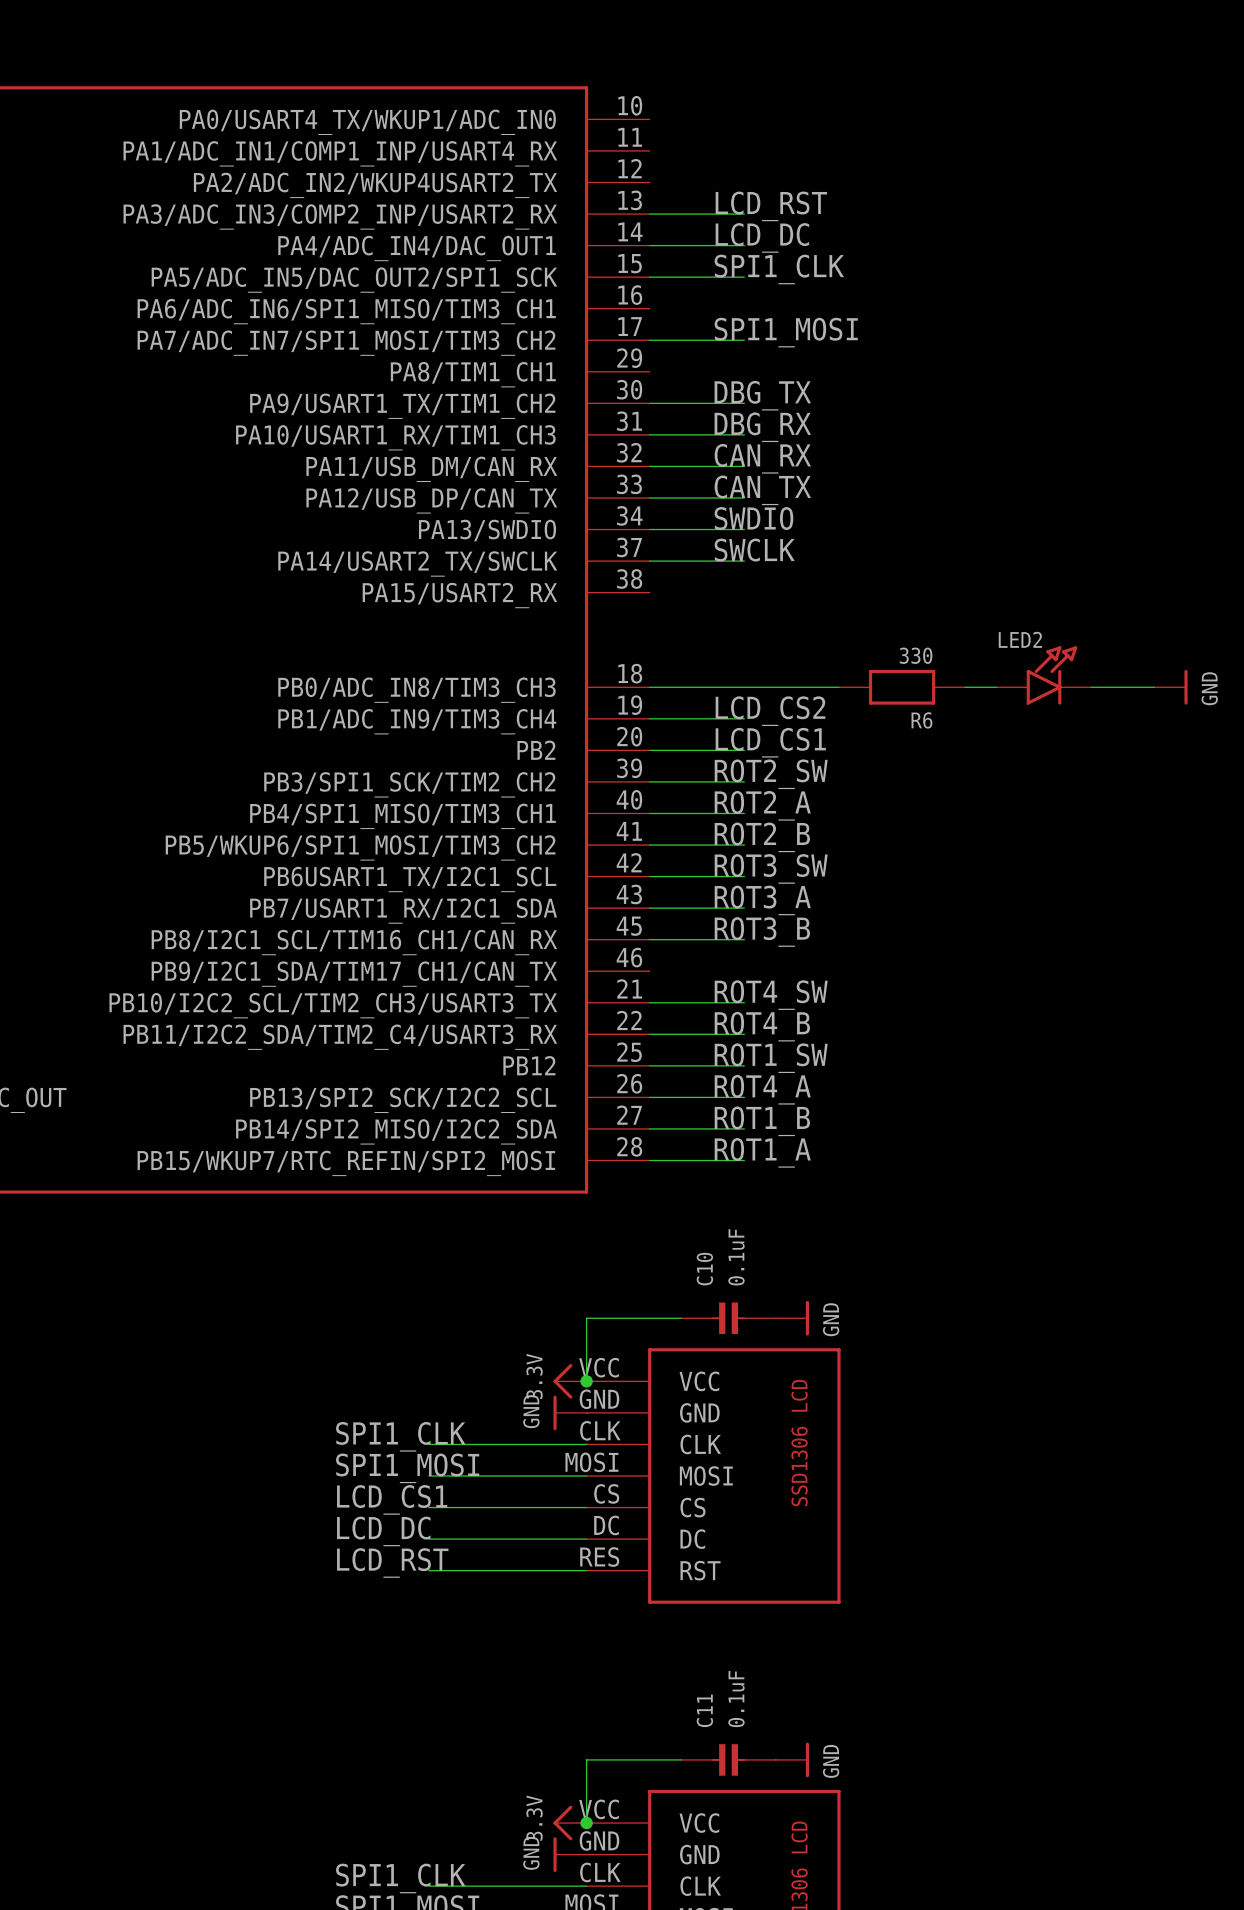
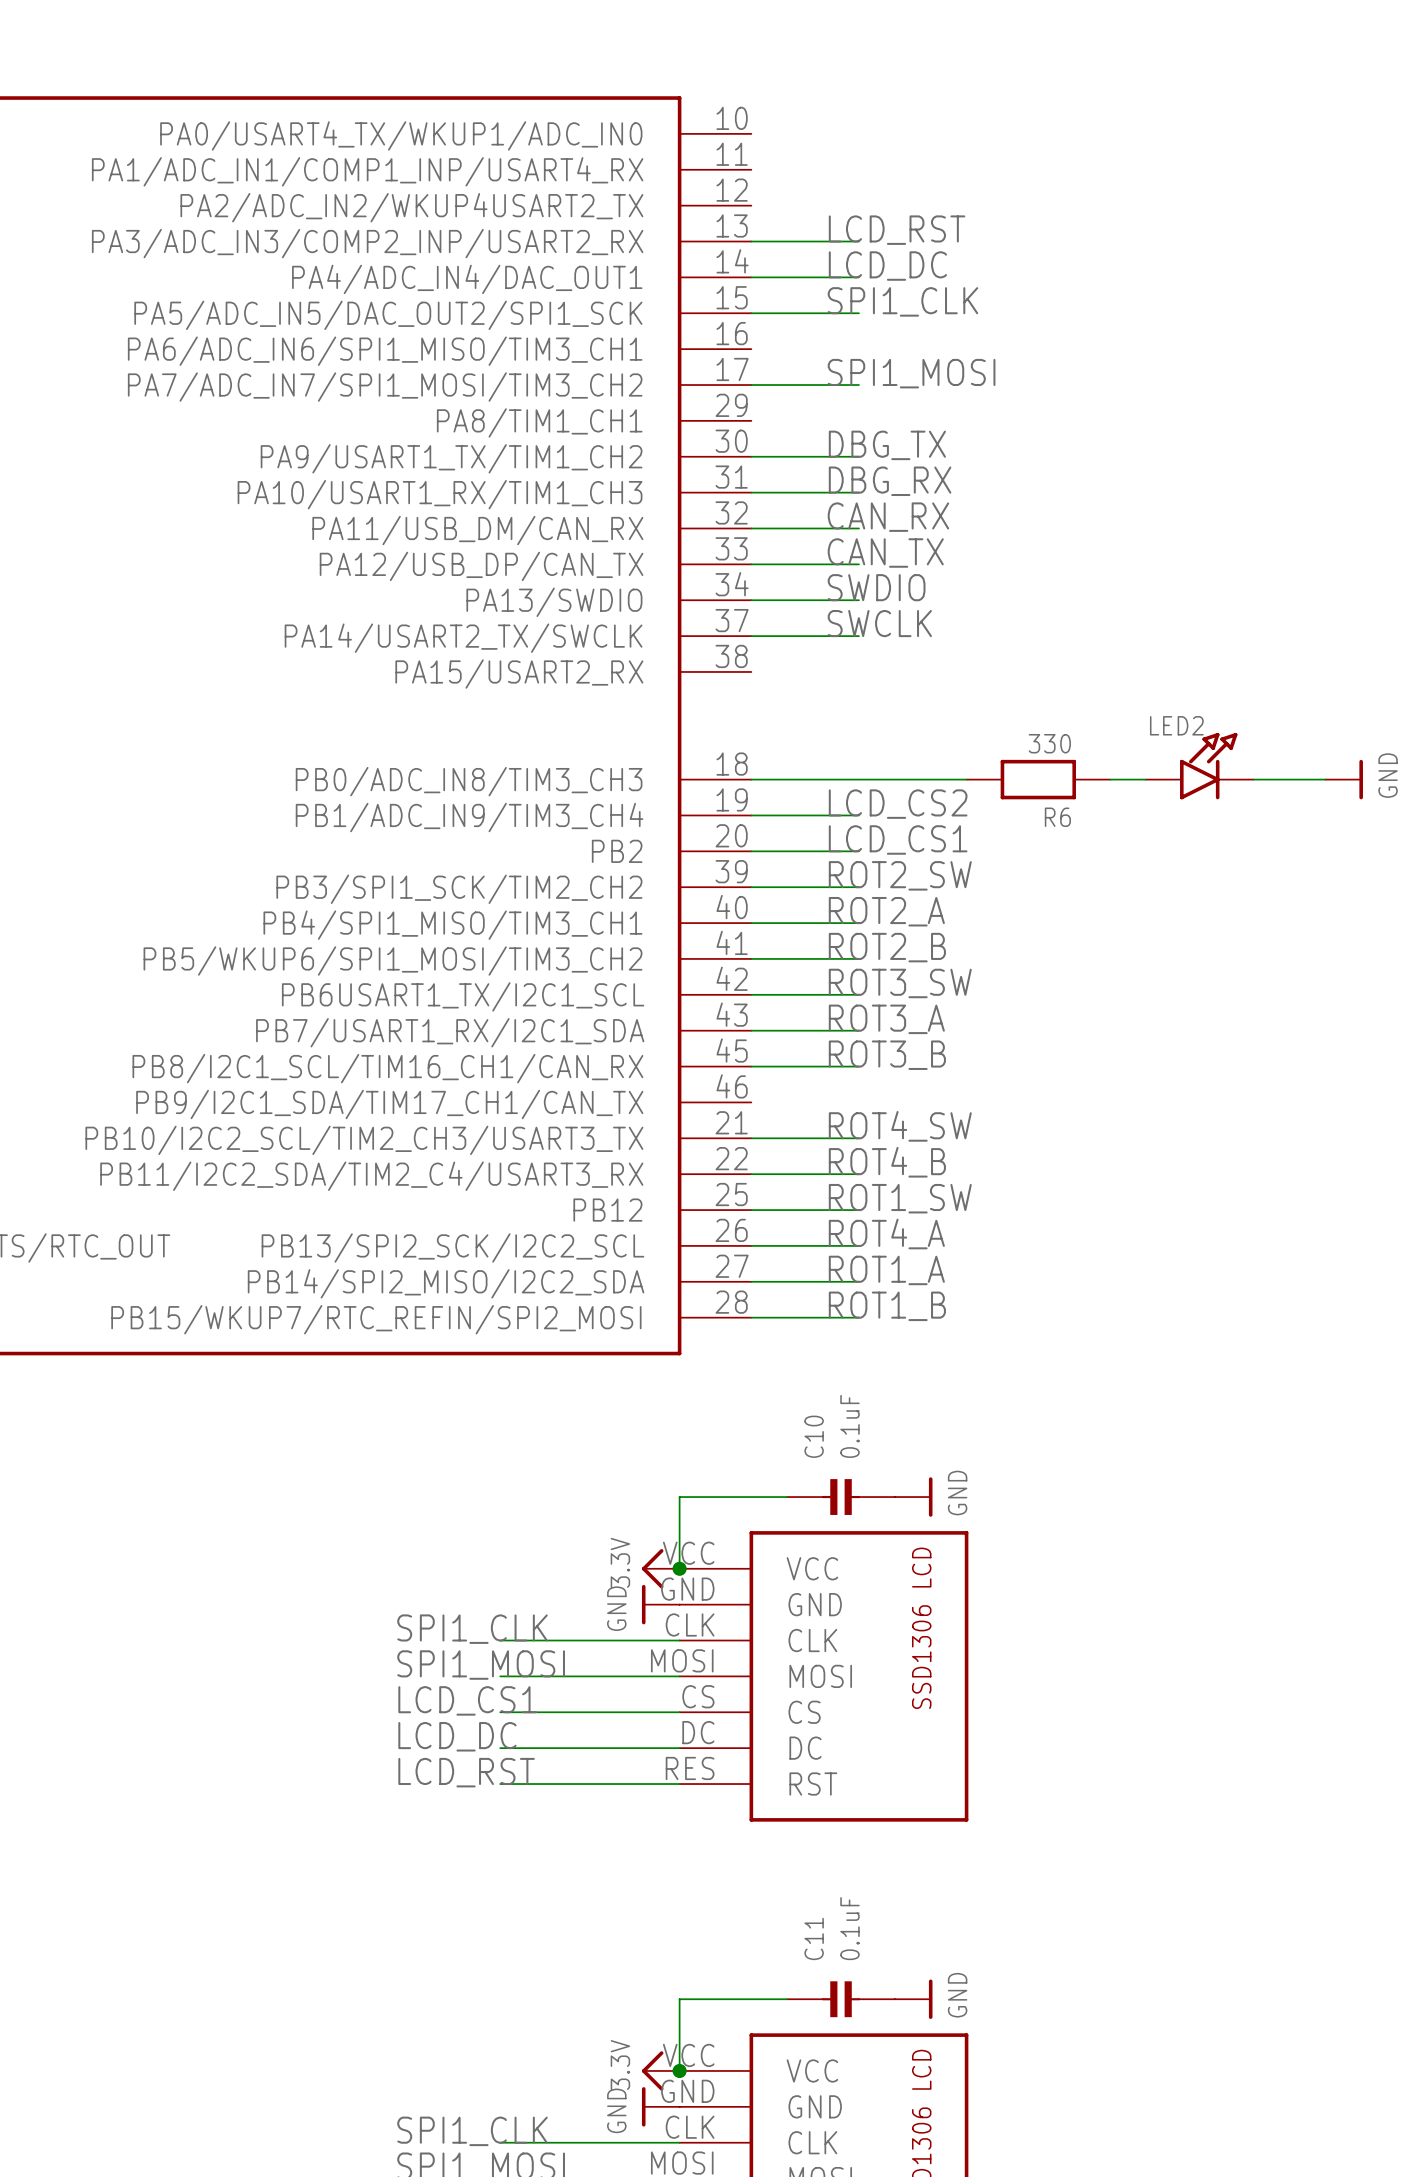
label: ROT1_B (762, 1121) -> ROT1_A (886, 1270)
label: ROT1_A (762, 1152) -> ROT1_B (887, 1306)

